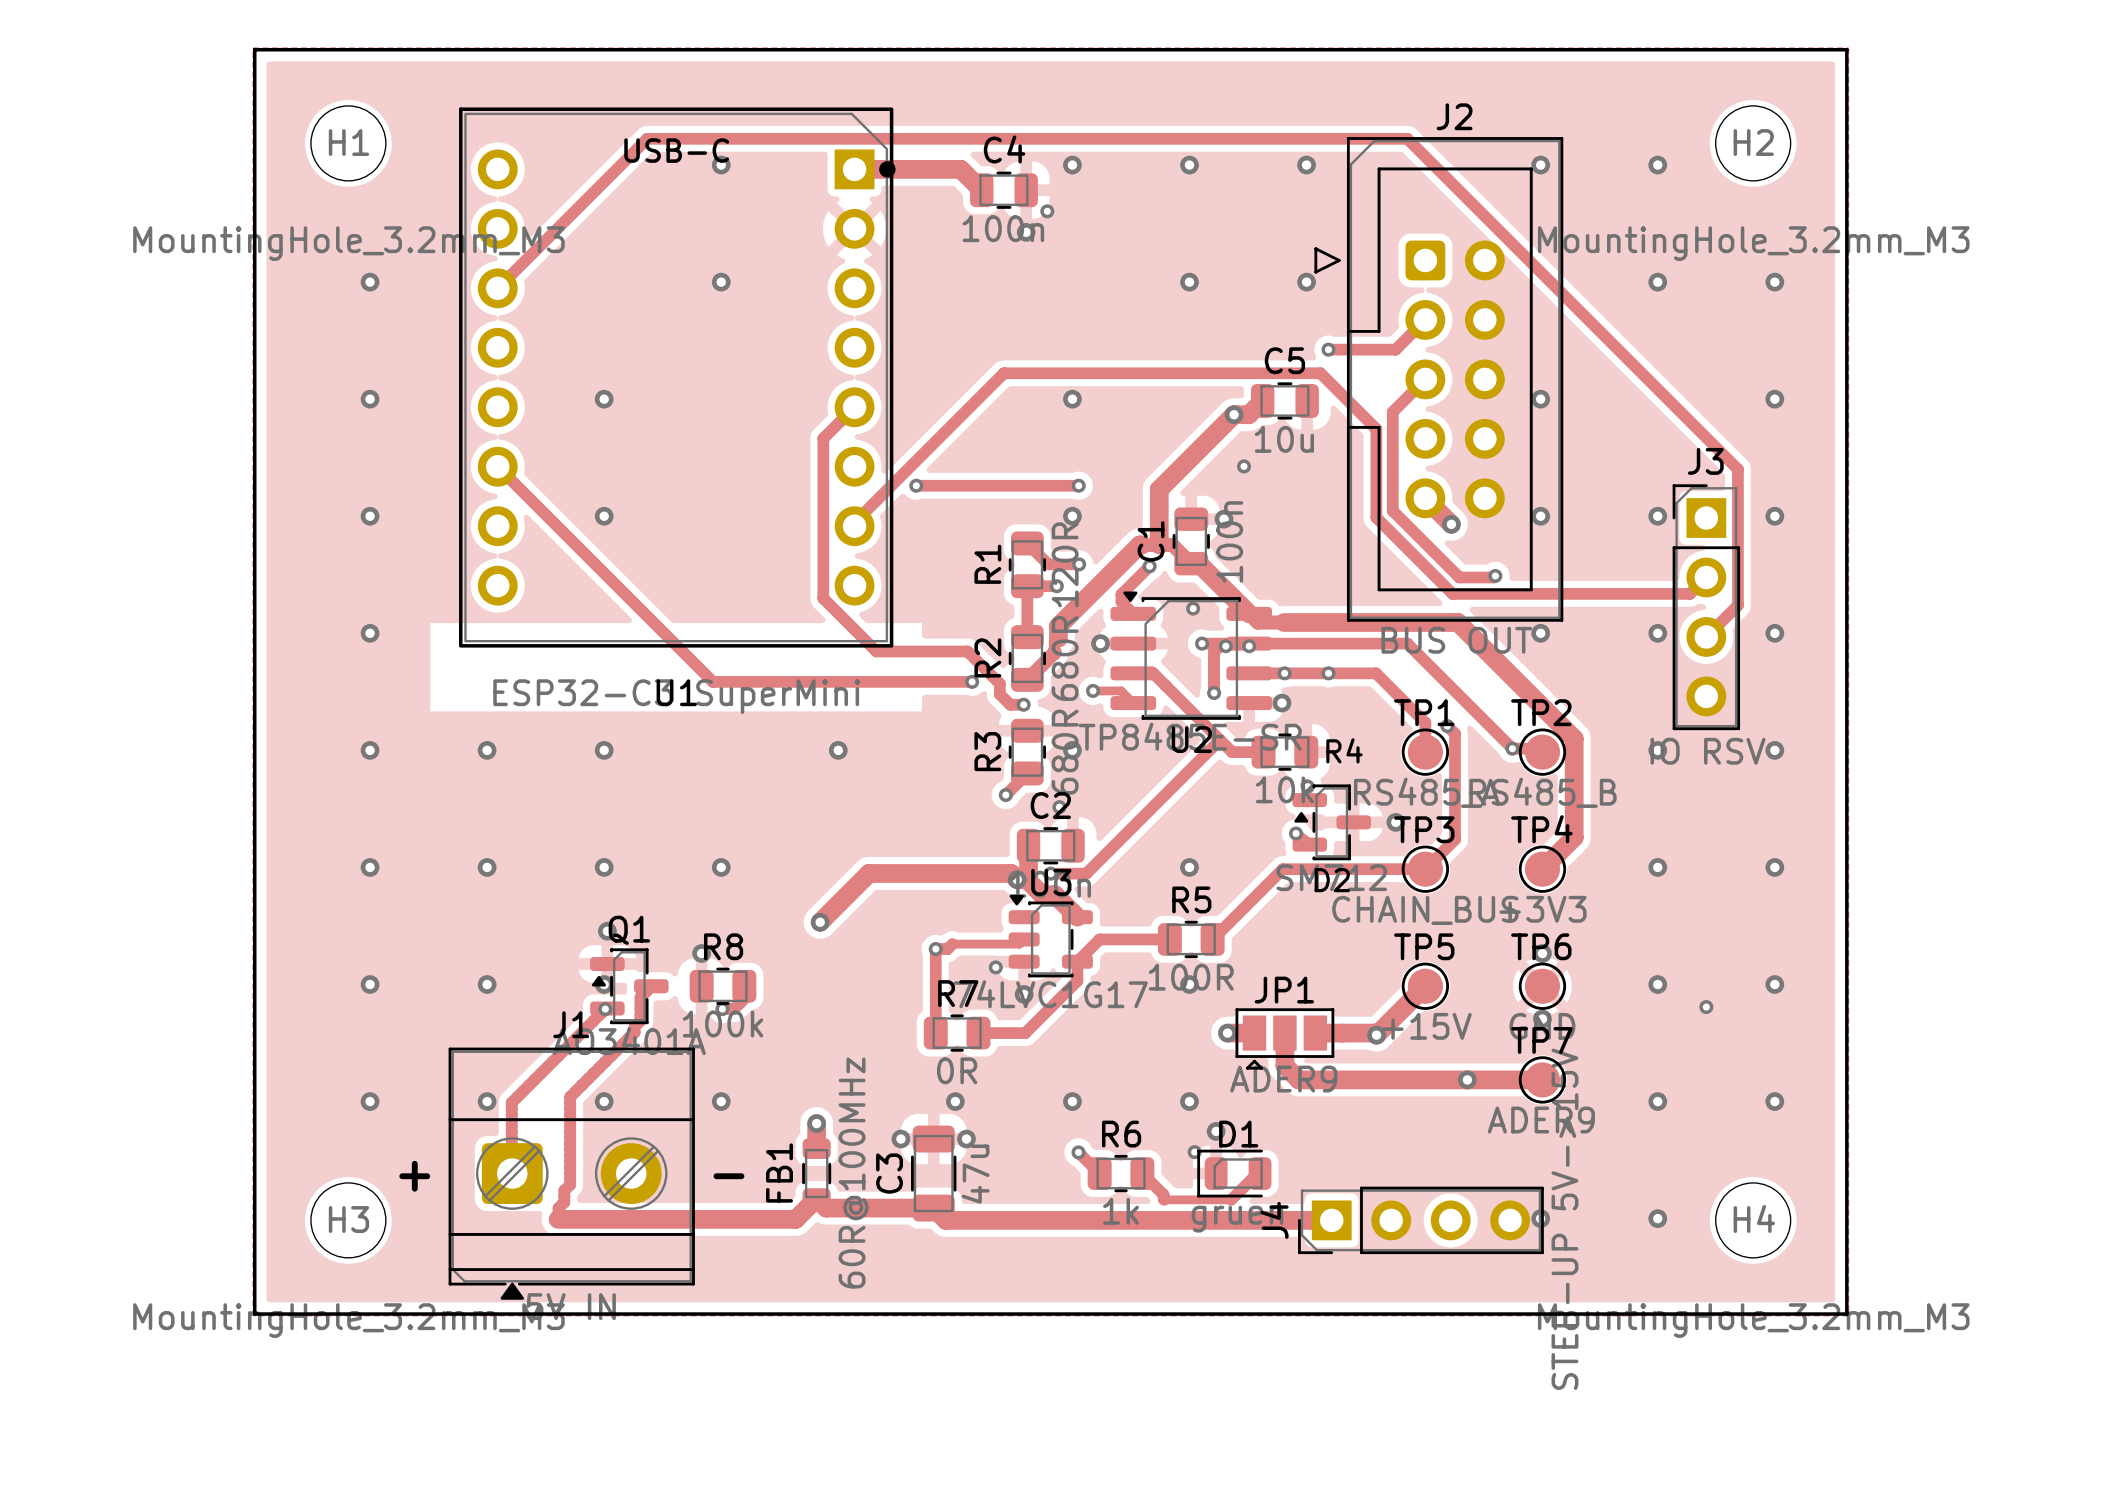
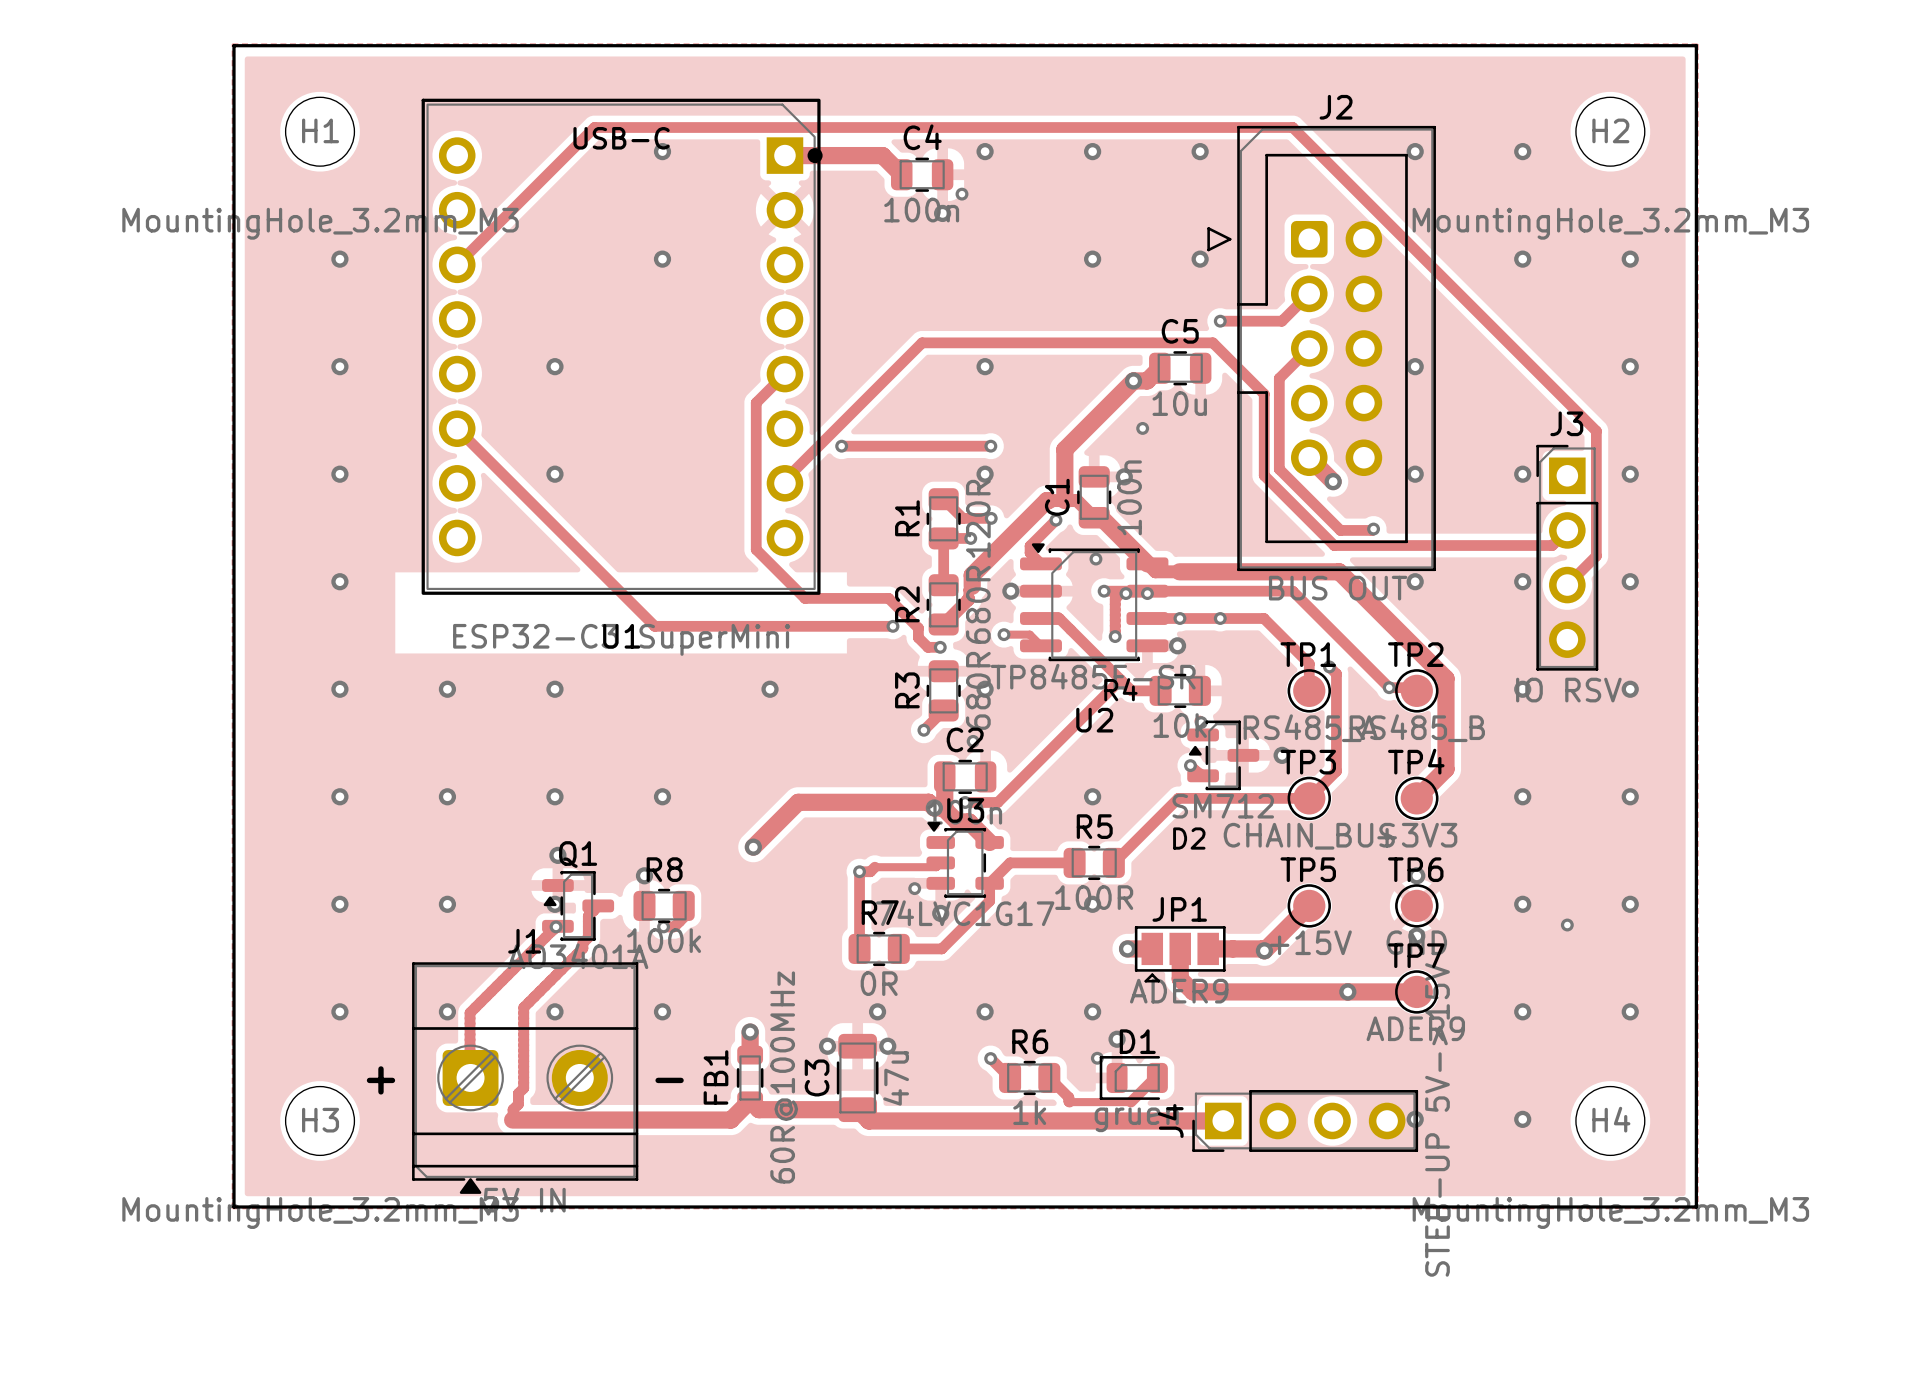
U2 name position: U2 (1191, 739) -> U2 (1094, 720)
R4 name position: R4 (1344, 750) -> R4 (1120, 689)
D2 name position: D2 (1332, 880) -> D2 (1189, 838)

